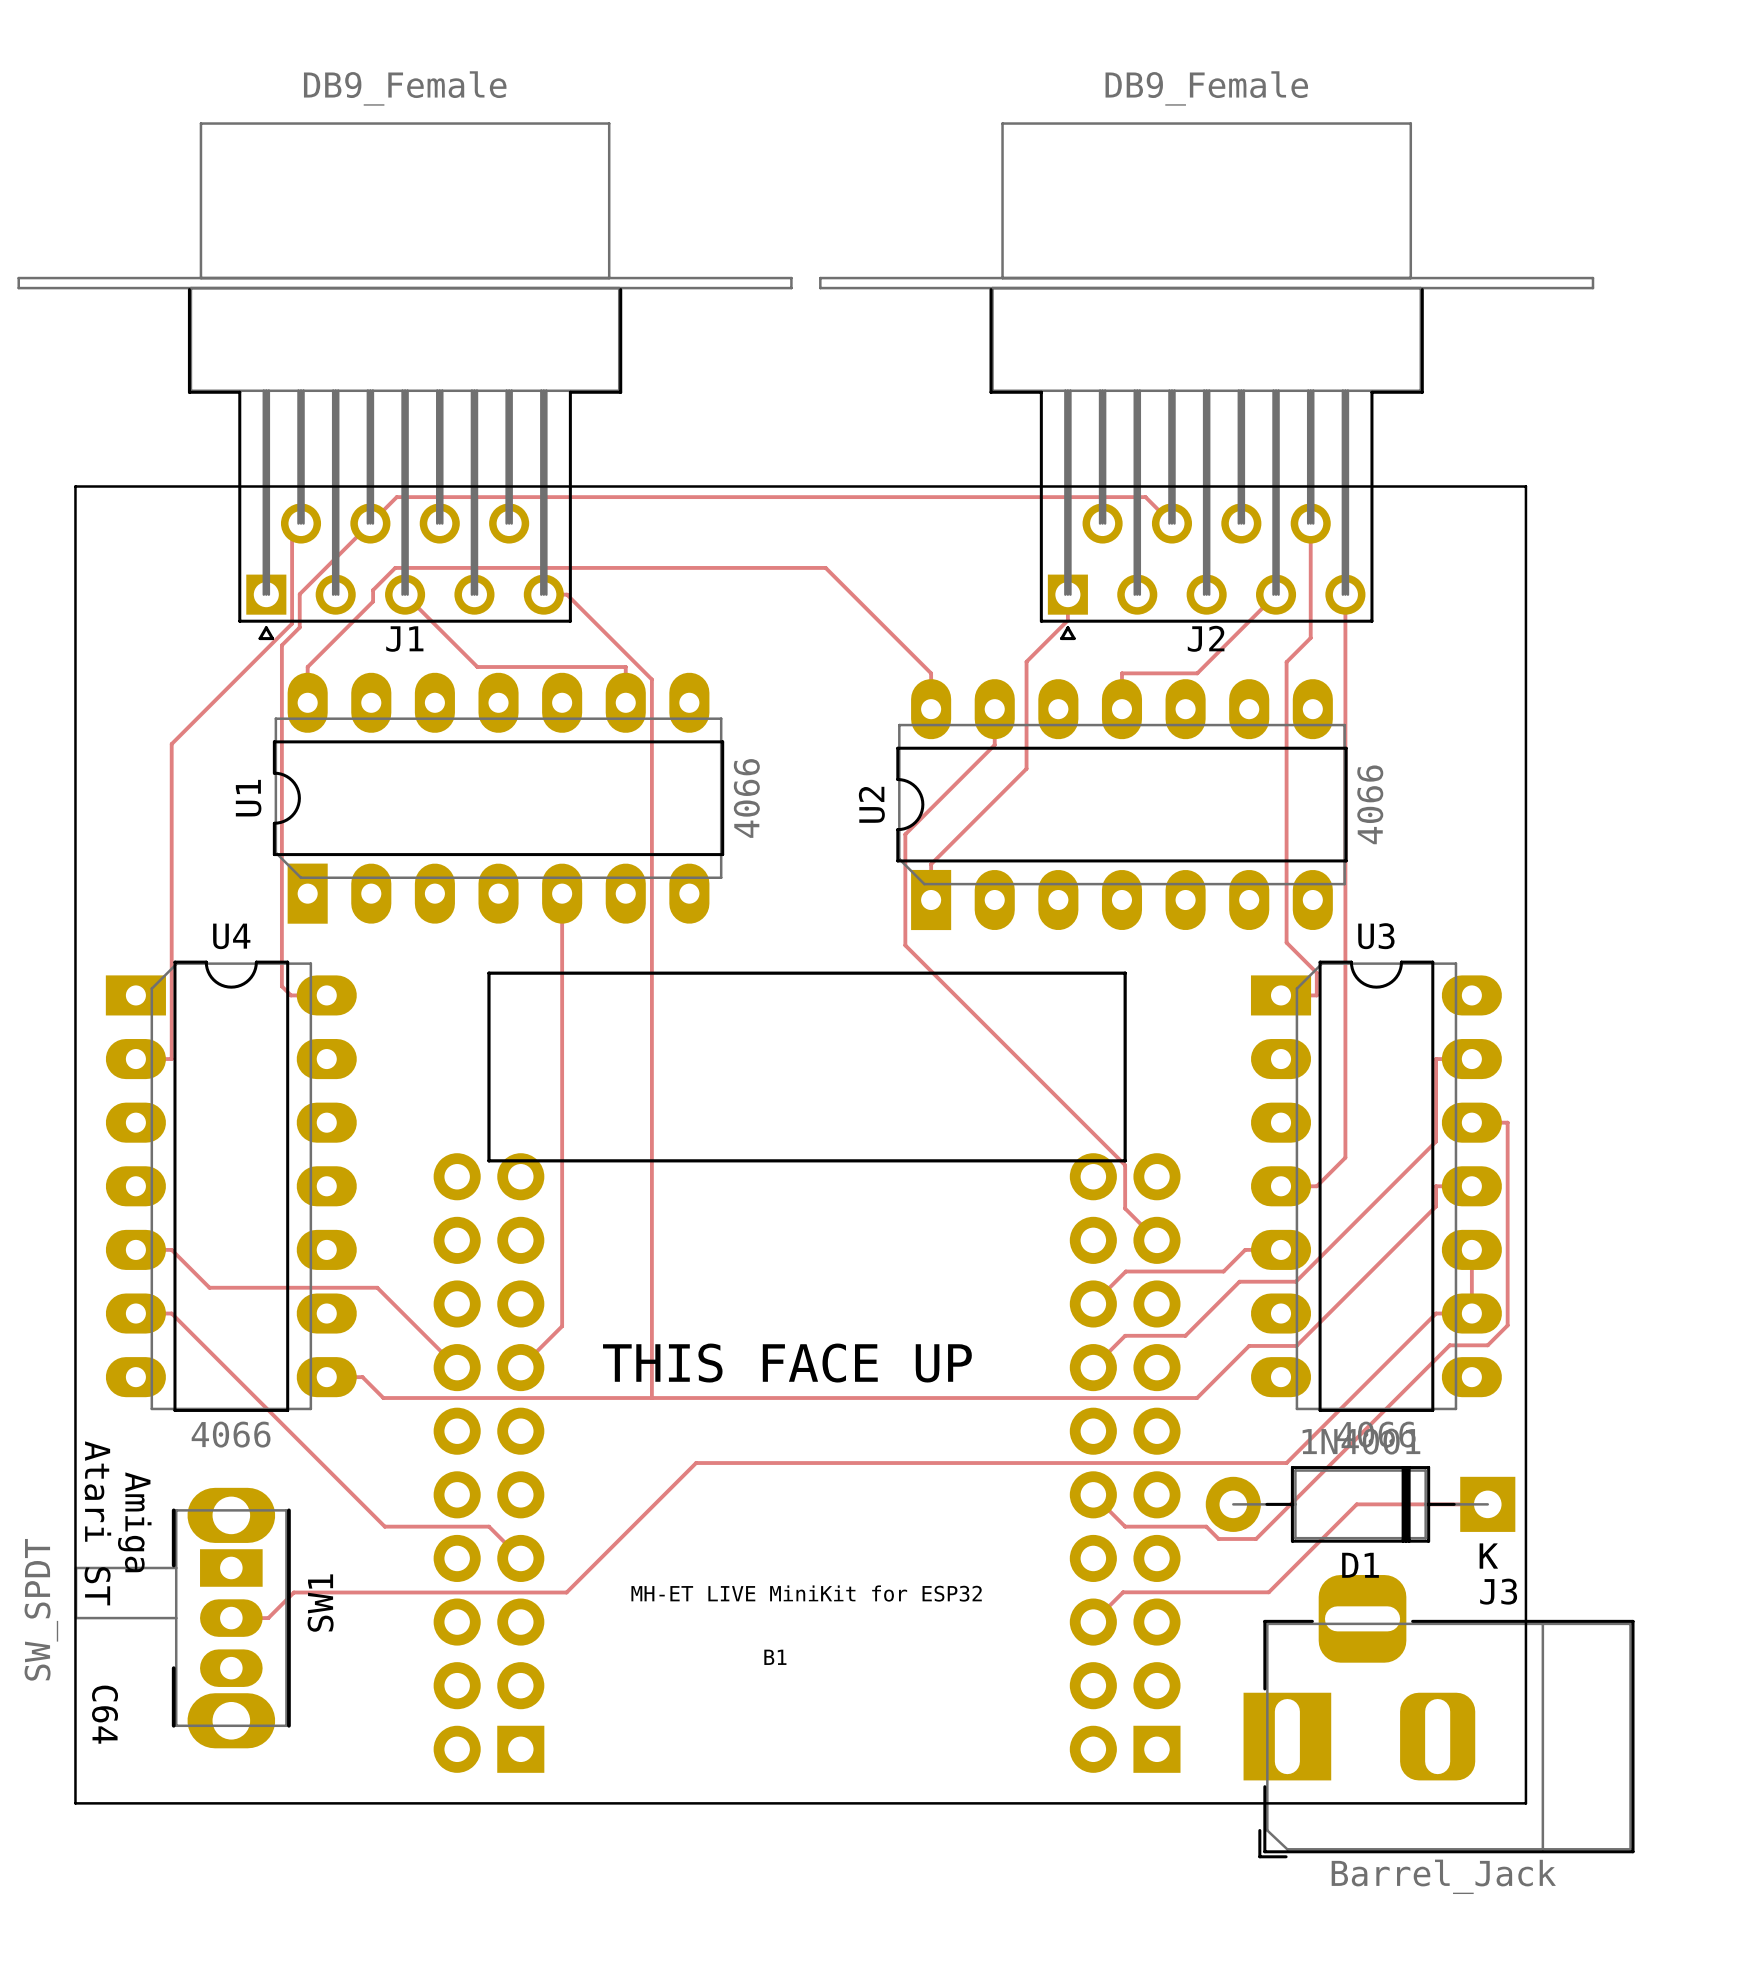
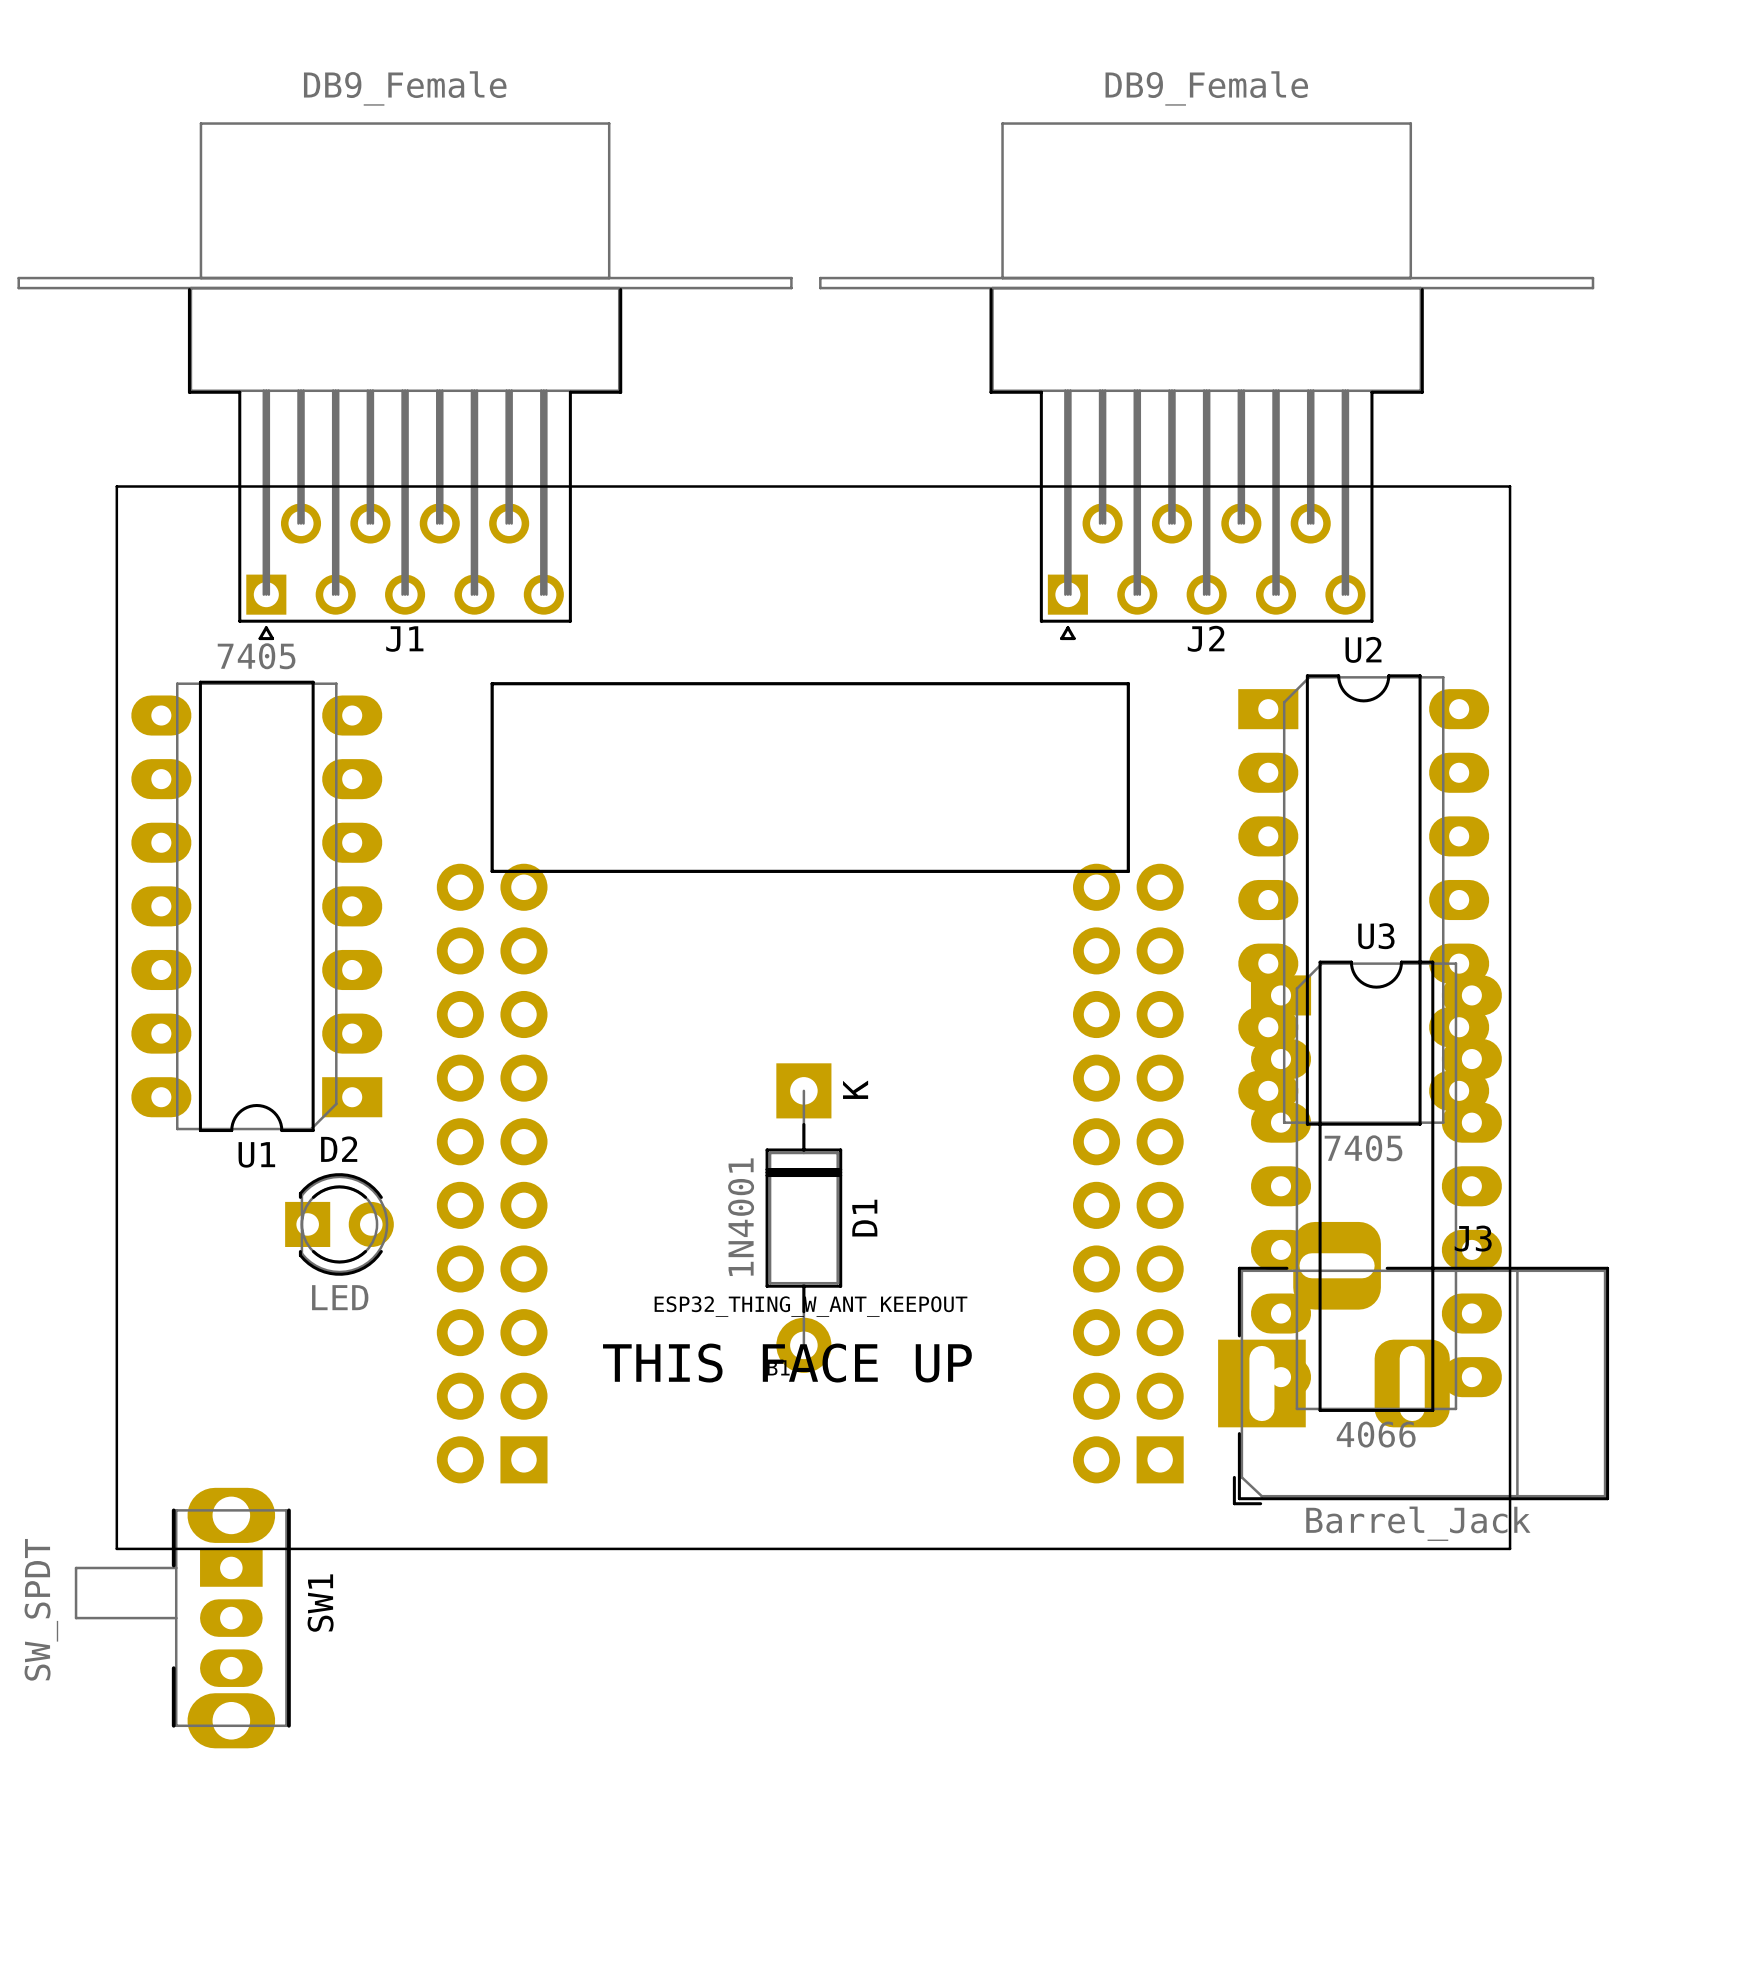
board edge: (116, 486) (75, 486) (75, 1803) (1525, 1803) (1525, 486) (1510, 486) -> (116, 486) (116, 1548) (1510, 1548) (1510, 486)
track: (301, 523) (292, 532) (292, 623) (171, 744) (171, 1059) (135, 1059) -> none
track: (1171, 523) (1145, 497) (396, 497) (299, 594) (299, 627) (281, 645) (281, 986) (290, 995) (326, 995) -> none
track: (1310, 523) (1310, 637) (1286, 662) (1286, 942) (1316, 972) (1316, 995) (1281, 995) -> none
track: (405, 594) (477, 667) (625, 667) (625, 702) -> none
track: (543, 594) (567, 594) (651, 679) (651, 1398) -> none
track: (1067, 594) (1067, 620) (1026, 661) (1026, 768) (931, 864) (931, 900) -> none
track: (1276, 594) (1197, 673) (1121, 673) (1121, 709) -> none
track: (1345, 594) (1345, 1157) (1316, 1186) (1281, 1186) -> none
track: (307, 702) (307, 667) (373, 601) (373, 590) (395, 567) (825, 567) (931, 673) (931, 709) -> none
track: (994, 709) (994, 744) (905, 834) (905, 945) (1125, 1165) (1125, 1208) (1156, 1240) -> none
U1 rotation: 0° (498, 798) -> 90° counterclockwise (256, 906)
U1 value: 4066 (746, 798) -> 7405 (256, 656)
U2 rotation: 0° (1121, 804) -> 90° clockwise (1363, 900)
U2 value: 4066 (1370, 804) -> 7405 (1363, 1148)
track: (562, 893) (562, 1326) (520, 1367) -> none
track: (1471, 1059) (1436, 1059) (1436, 1141) (1295, 1281) (1239, 1281) (1185, 1335) (1125, 1335) (1093, 1367) -> none
track: (1471, 1122) (1507, 1122) (1507, 1325) (1487, 1345) (1449, 1345) (1256, 1538) (1218, 1538) (1206, 1526) (1125, 1526) (1093, 1494) -> none
U4: 4066 (231, 1186) -> none
track: (1471, 1186) (1436, 1186) (1436, 1206) (1296, 1345) (1249, 1345) (1197, 1398) (383, 1398) (362, 1377) (326, 1377) -> none
D2: none -> LED (339, 1224)
track: (135, 1249) (171, 1249) (209, 1287) (377, 1287) (457, 1367) -> none
track: (1281, 1249) (1245, 1249) (1223, 1271) (1125, 1271) (1093, 1303) -> none
track: (1471, 1249) (1471, 1313) (1436, 1313) (1286, 1463) (696, 1463) (566, 1592) (293, 1592) (268, 1618) (231, 1618) -> none
track: (135, 1313) (171, 1313) (384, 1526) (488, 1526) (520, 1558) -> none
B1 position: (807, 1372) -> (810, 1082)
D1 rotation: 0° (1360, 1504) -> 90° counterclockwise (803, 1218)
D1 position: (1360, 1504) -> (803, 1218)
track: (1487, 1504) (1356, 1504) (1268, 1592) (1123, 1592) (1093, 1622) -> none
text: Amiga (134, 1522) -> none
text: Atari ST (97, 1523) -> none
B1 value: MH-ET LIVE MiniKit for ESP32 (806, 1593) -> ESP32_THING_W_ANT_KEEPOUT (811, 1306)
text: C64 (105, 1714) -> none
J3 position: (1439, 1716) -> (1413, 1363)

